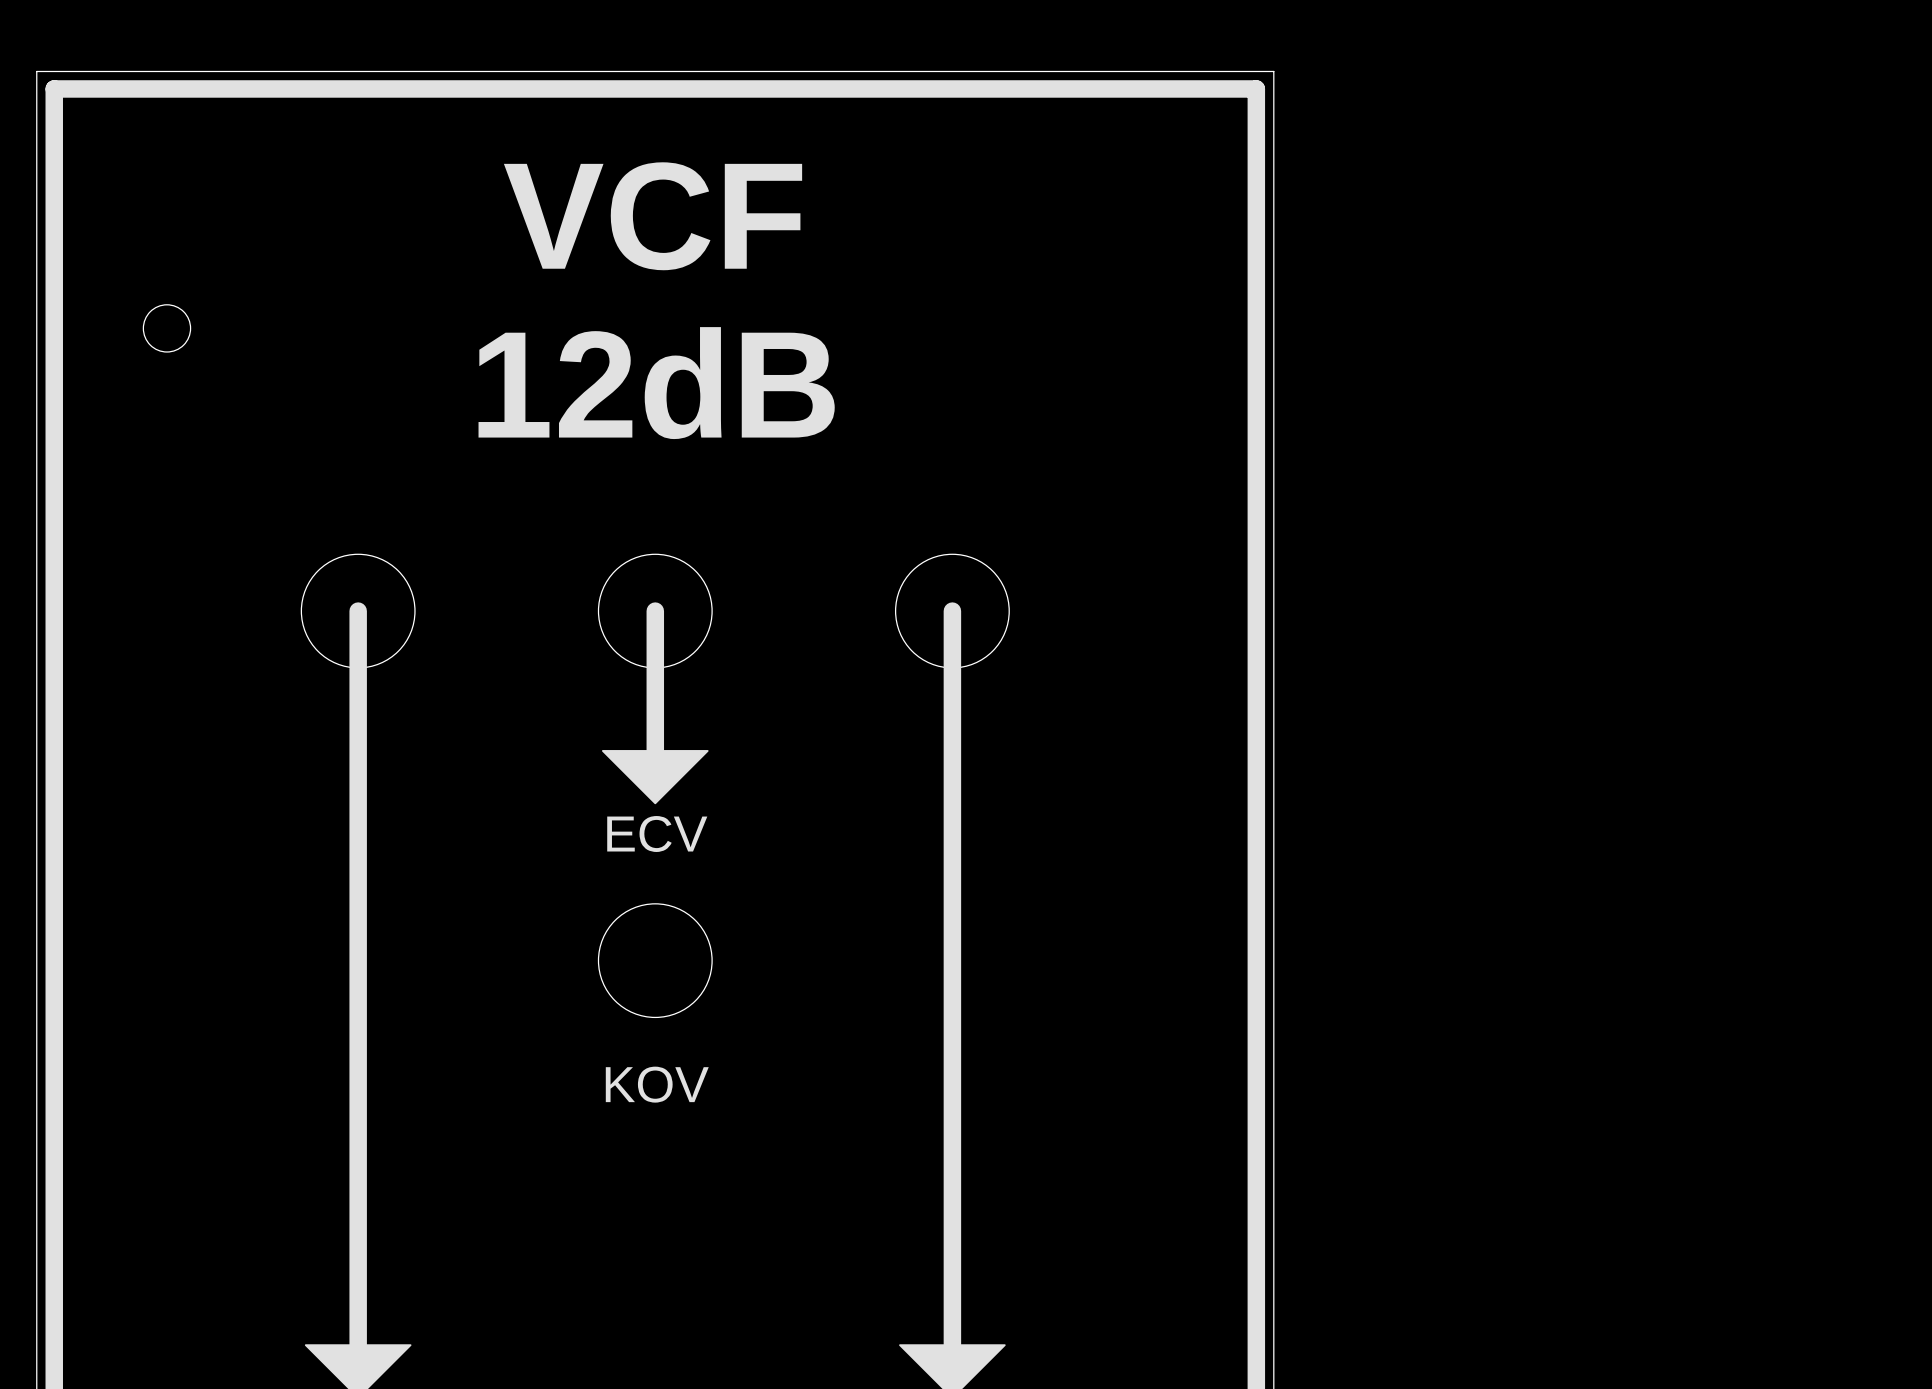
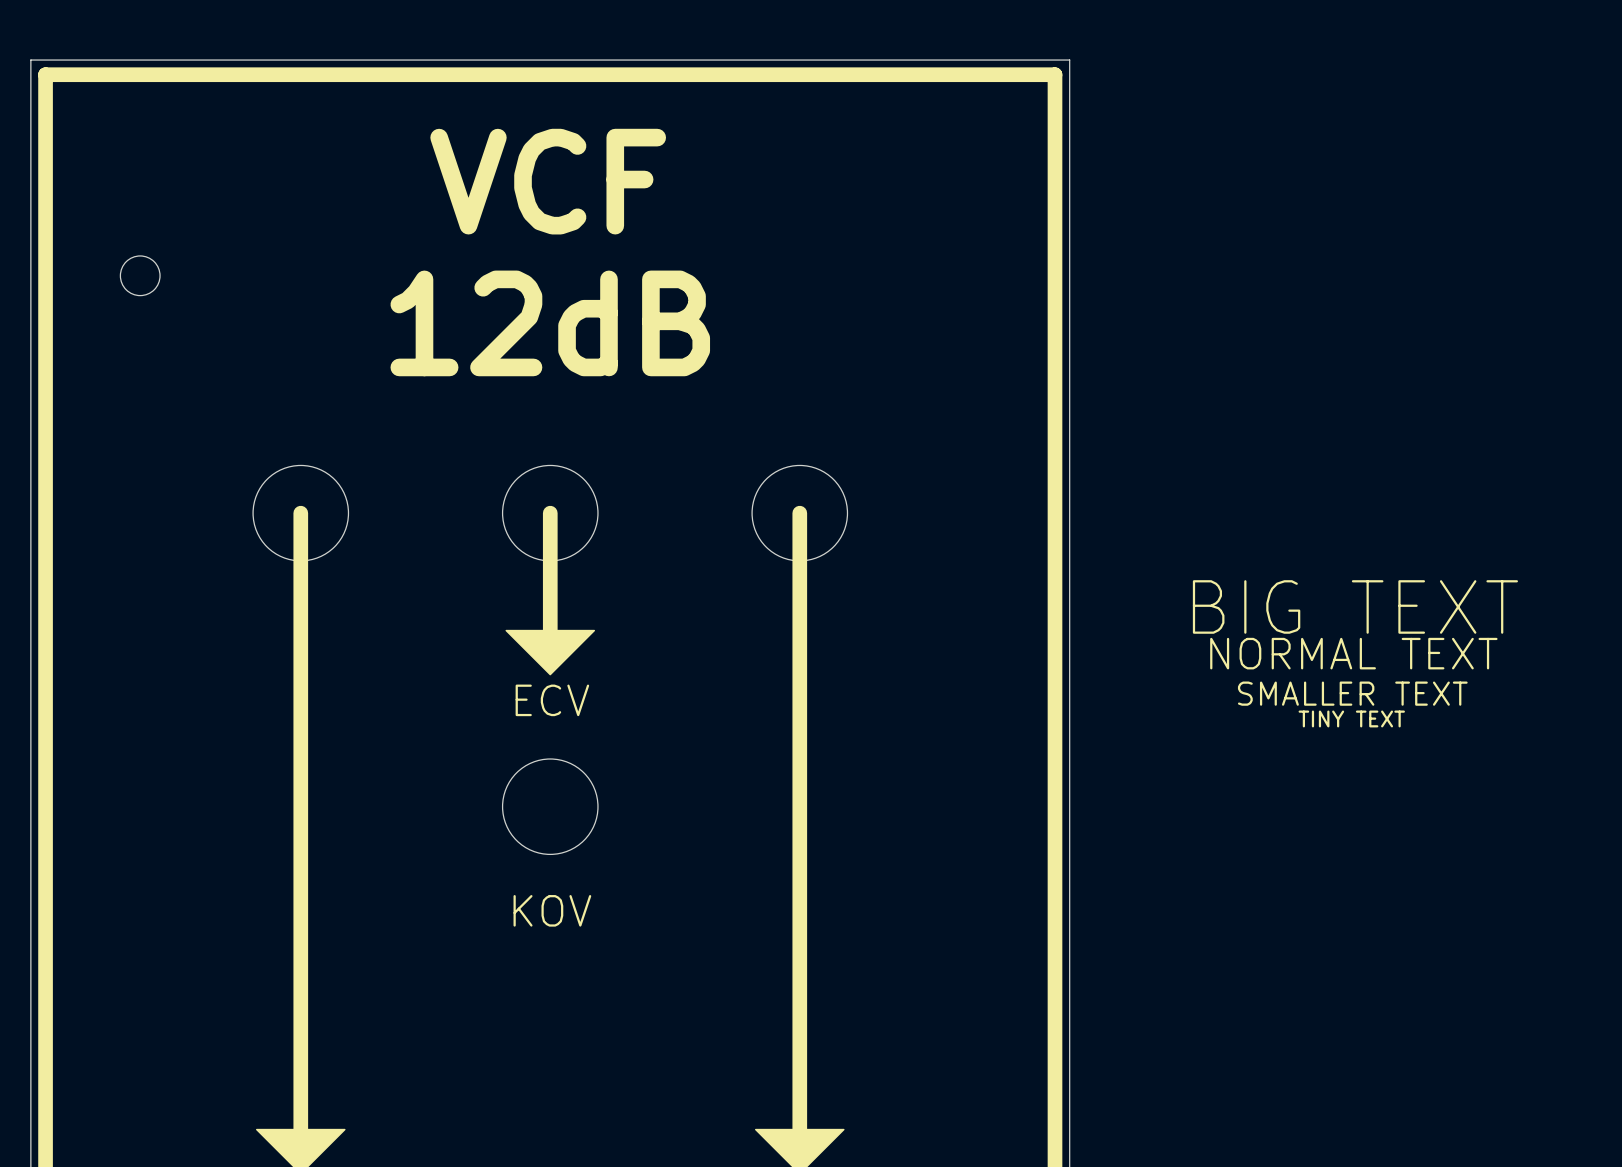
text: none -> BIG TEXT (1355, 606)
text: none -> NORMAL TEXT (1353, 653)
text: none -> SMALLER TEXT (1352, 693)
text: none -> TINY TEXT (1351, 718)

